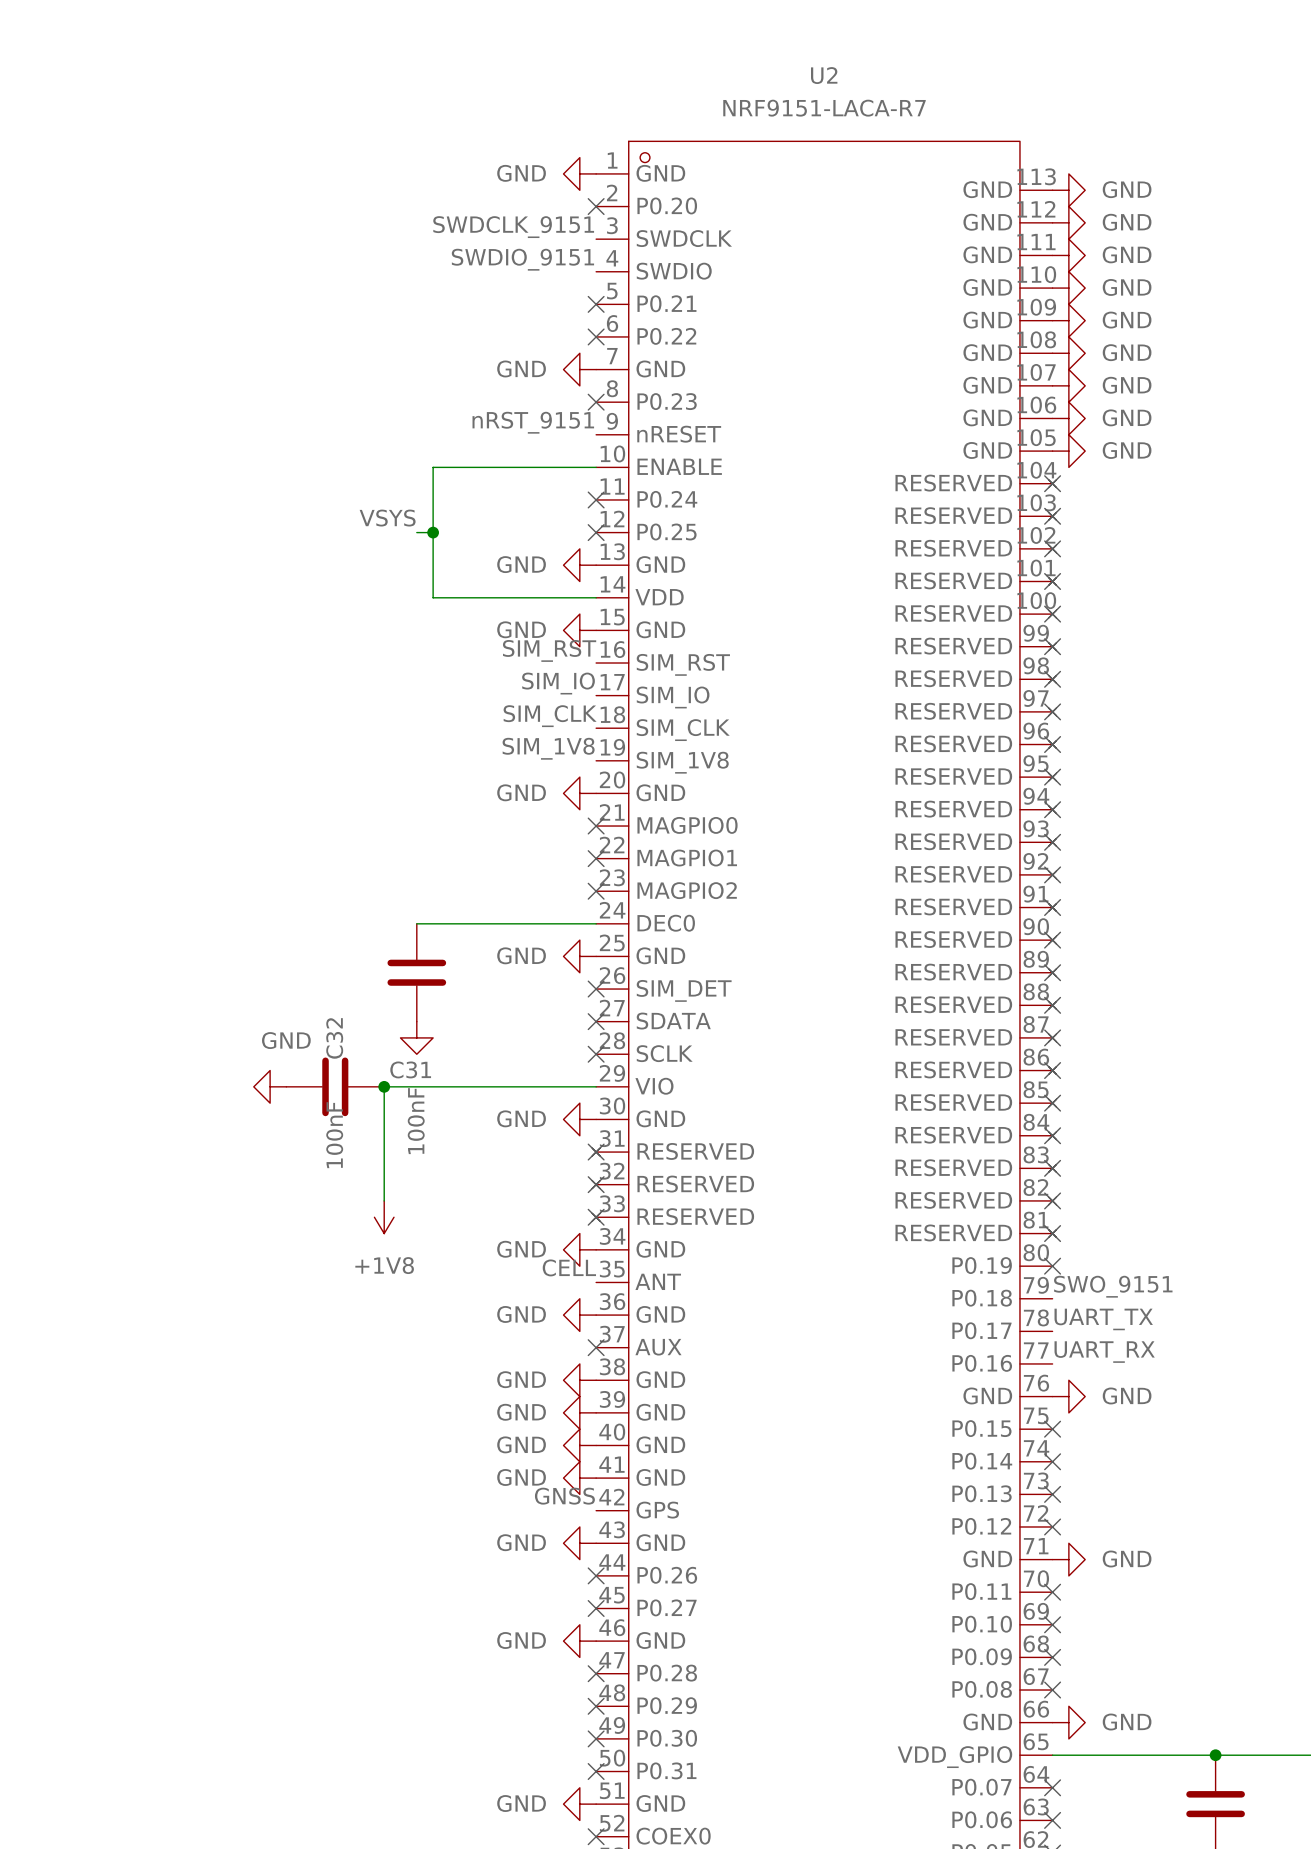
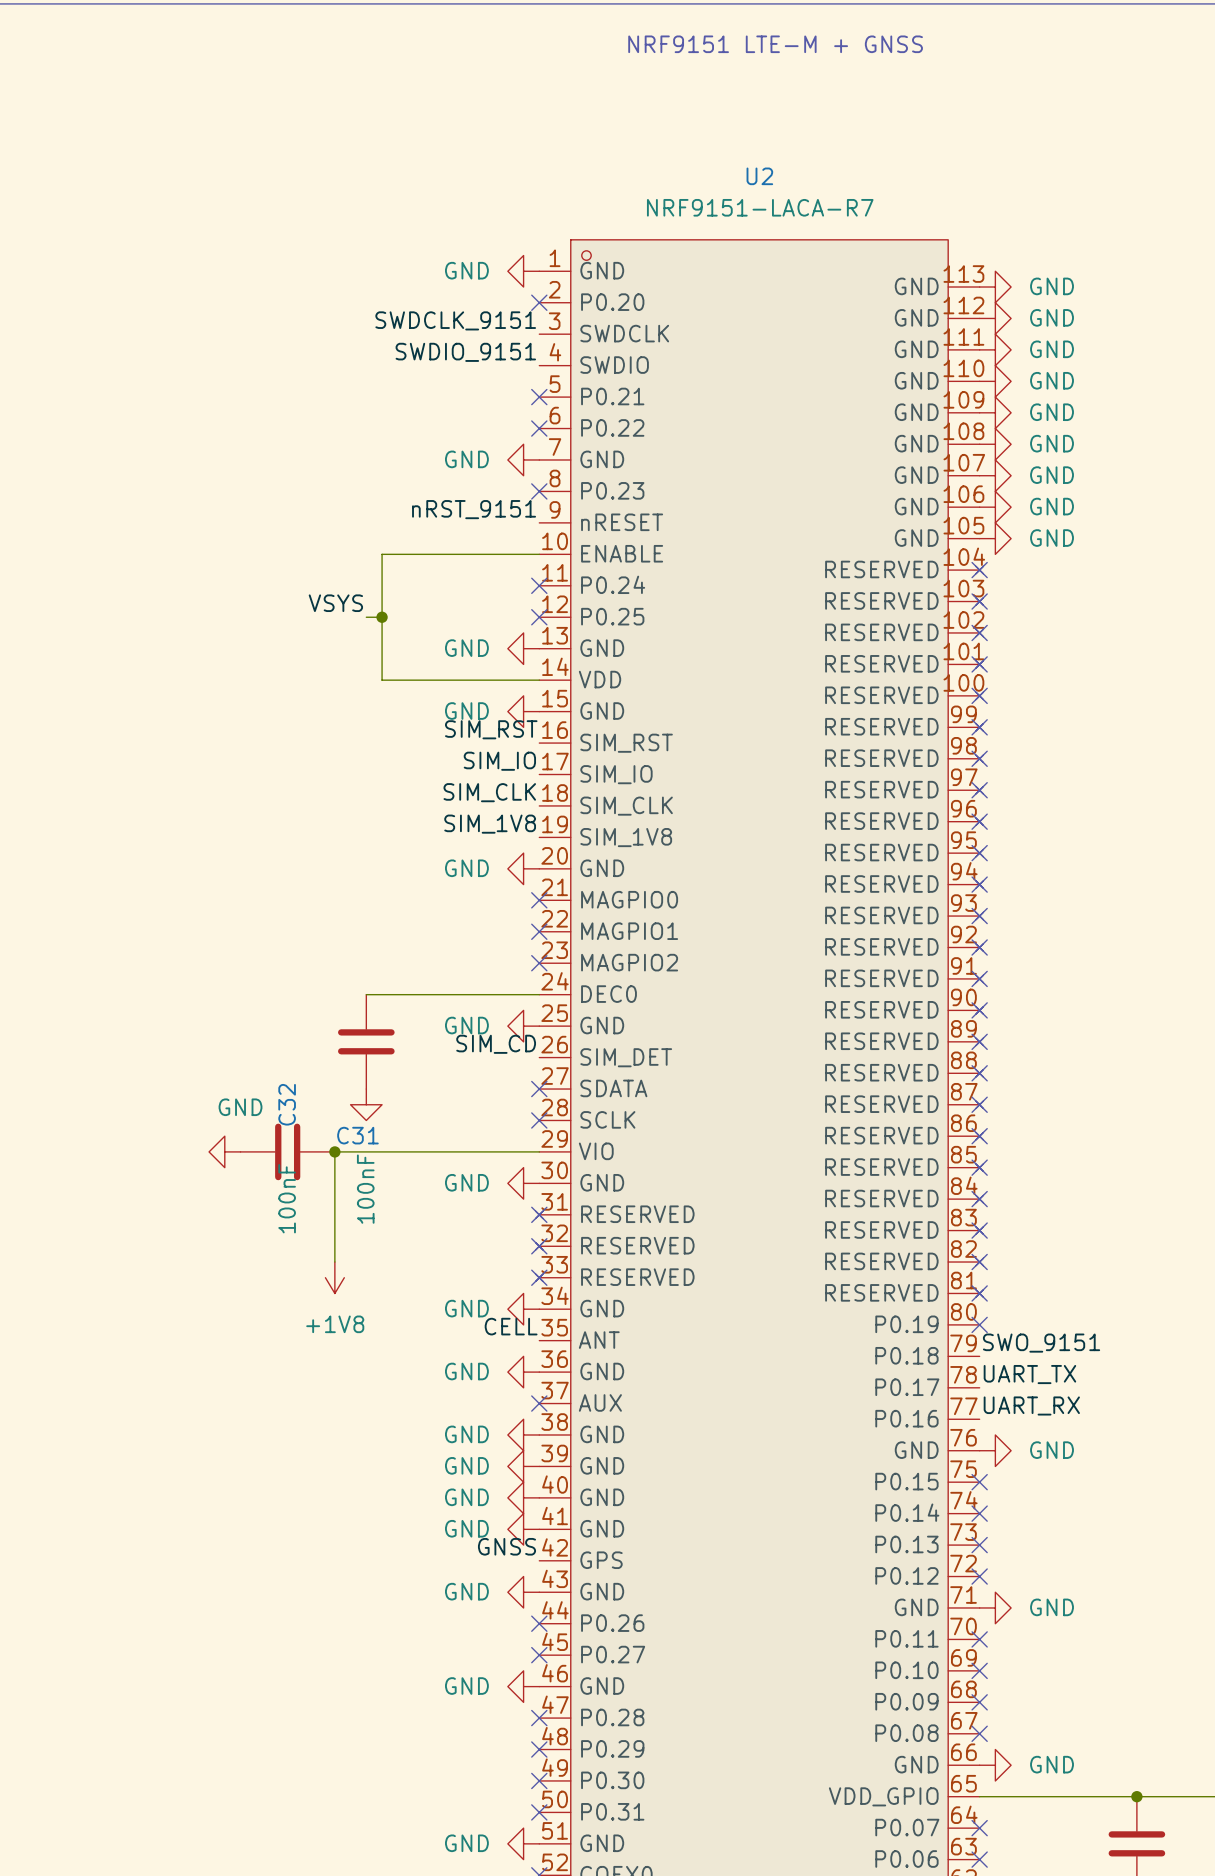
label: none -> SIM_CD (496, 1044)
no-connect mark: (596, 989) -> none

